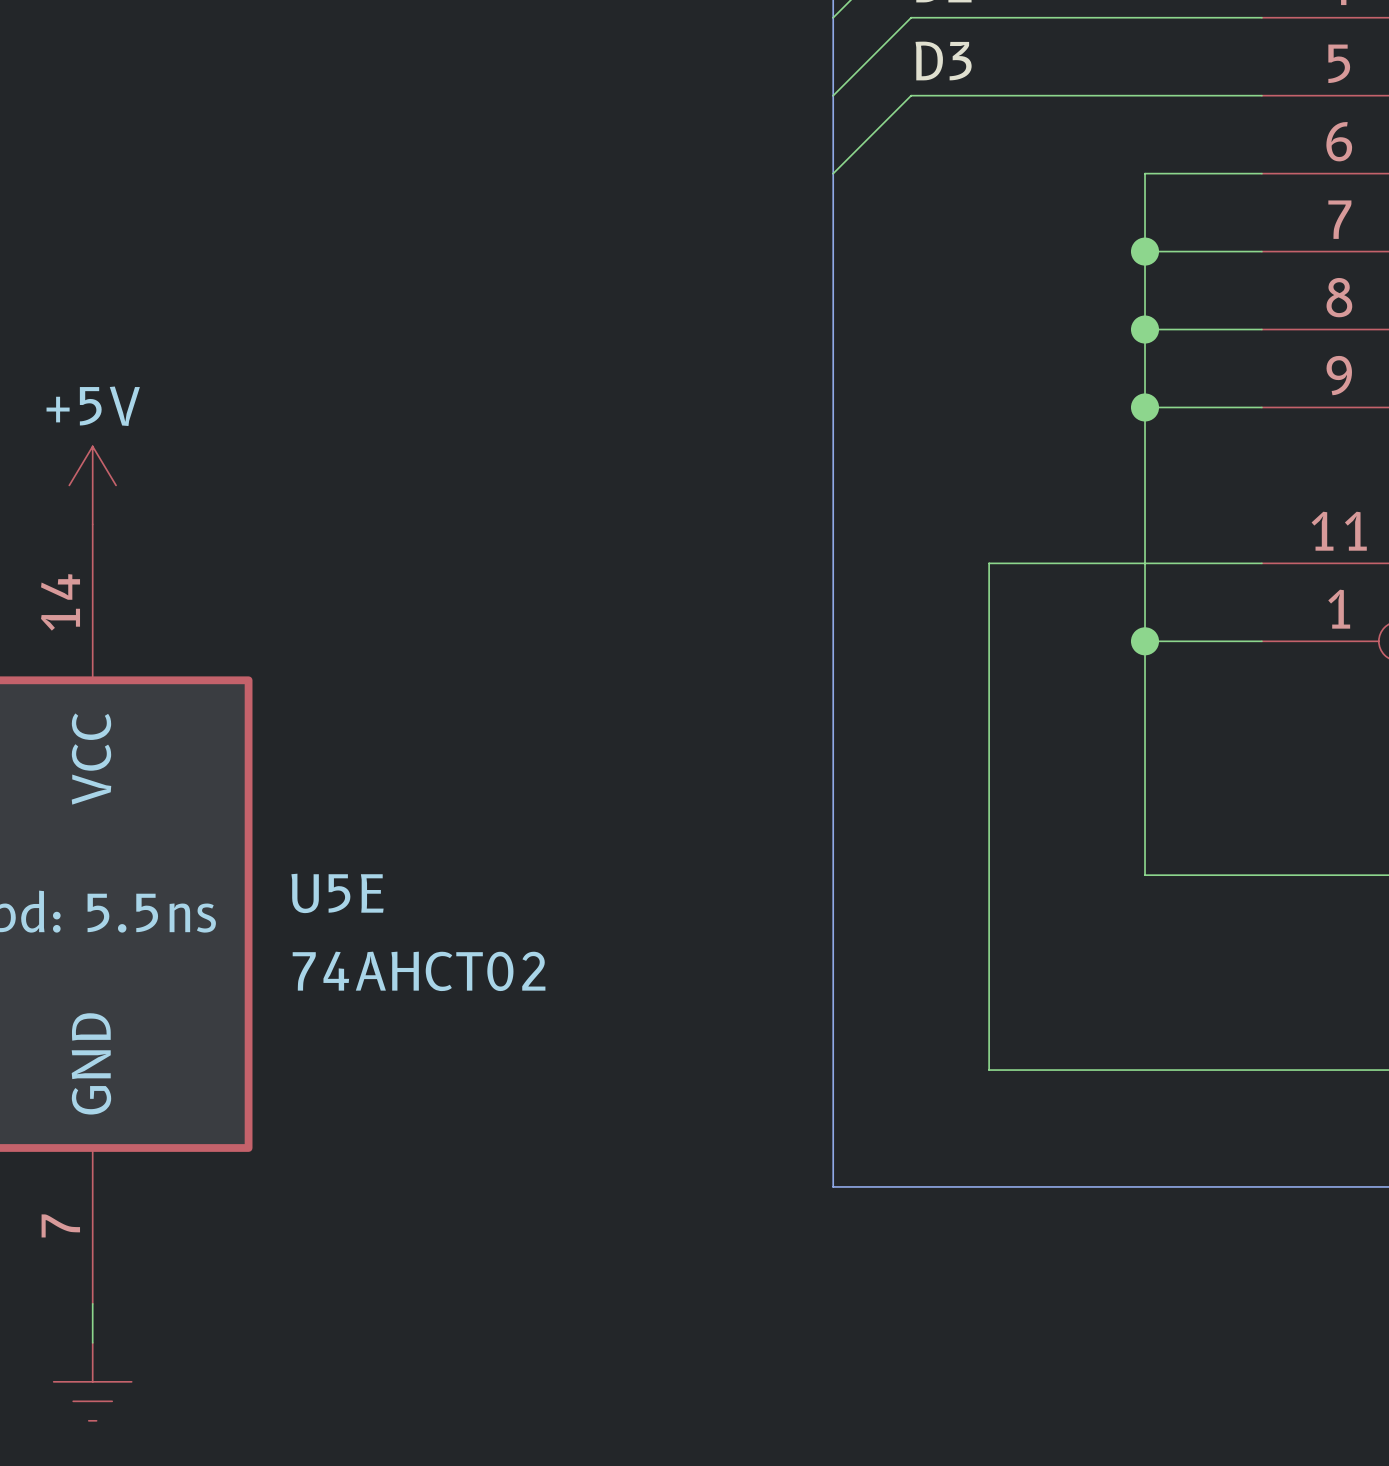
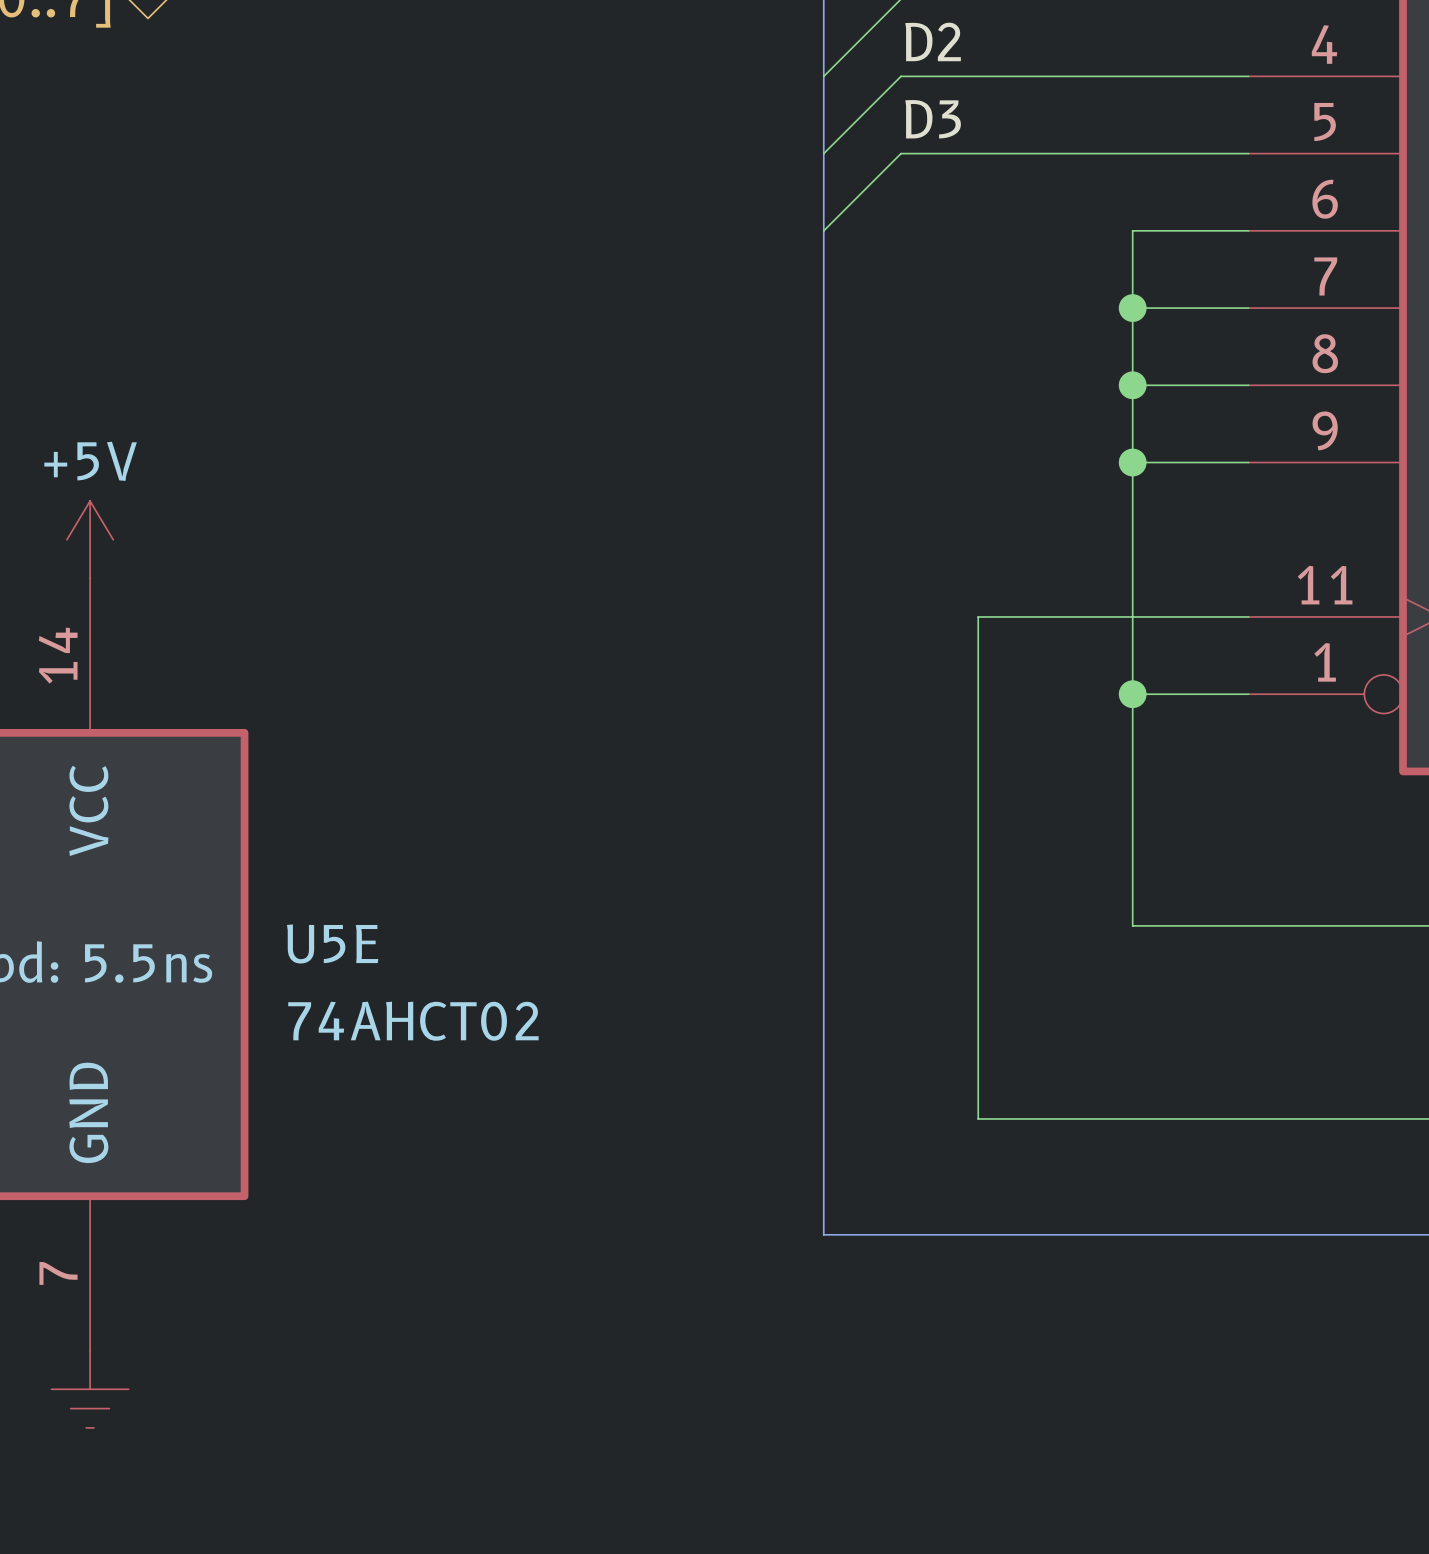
power symbol position: (92, 1381) -> (90, 1389)

